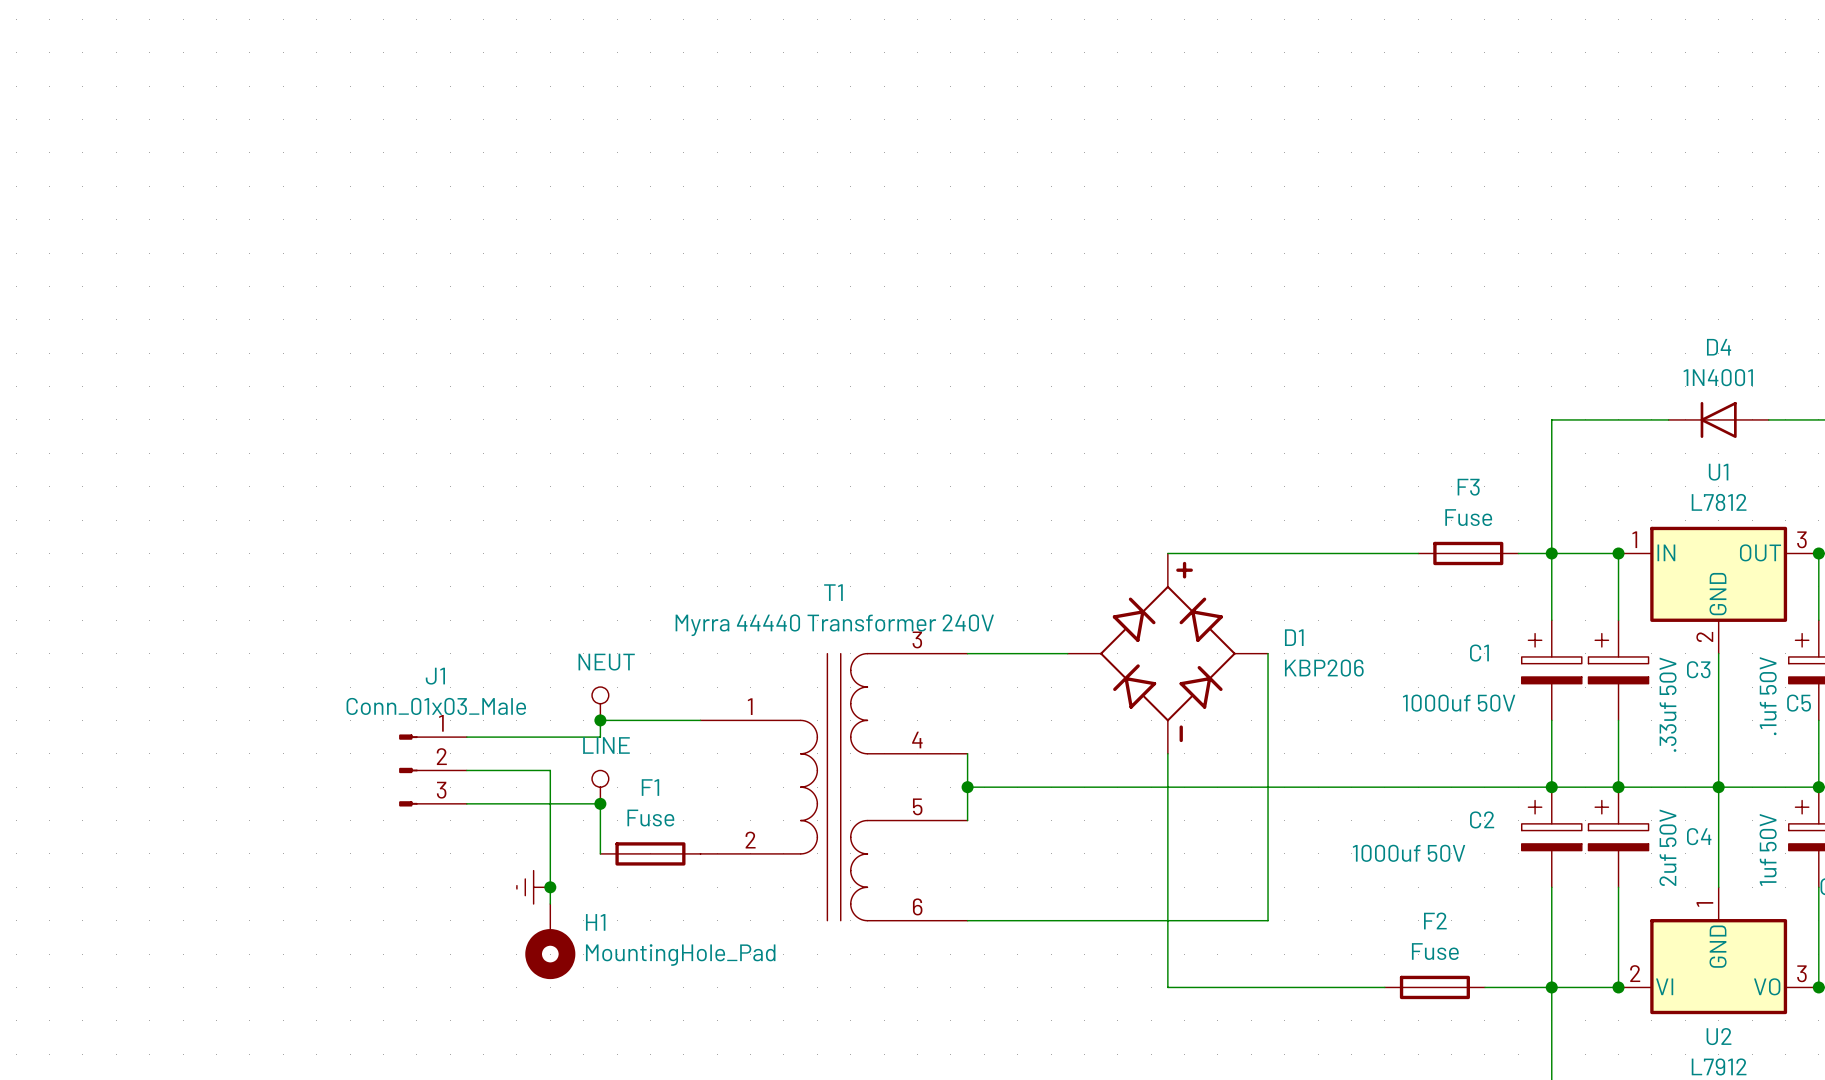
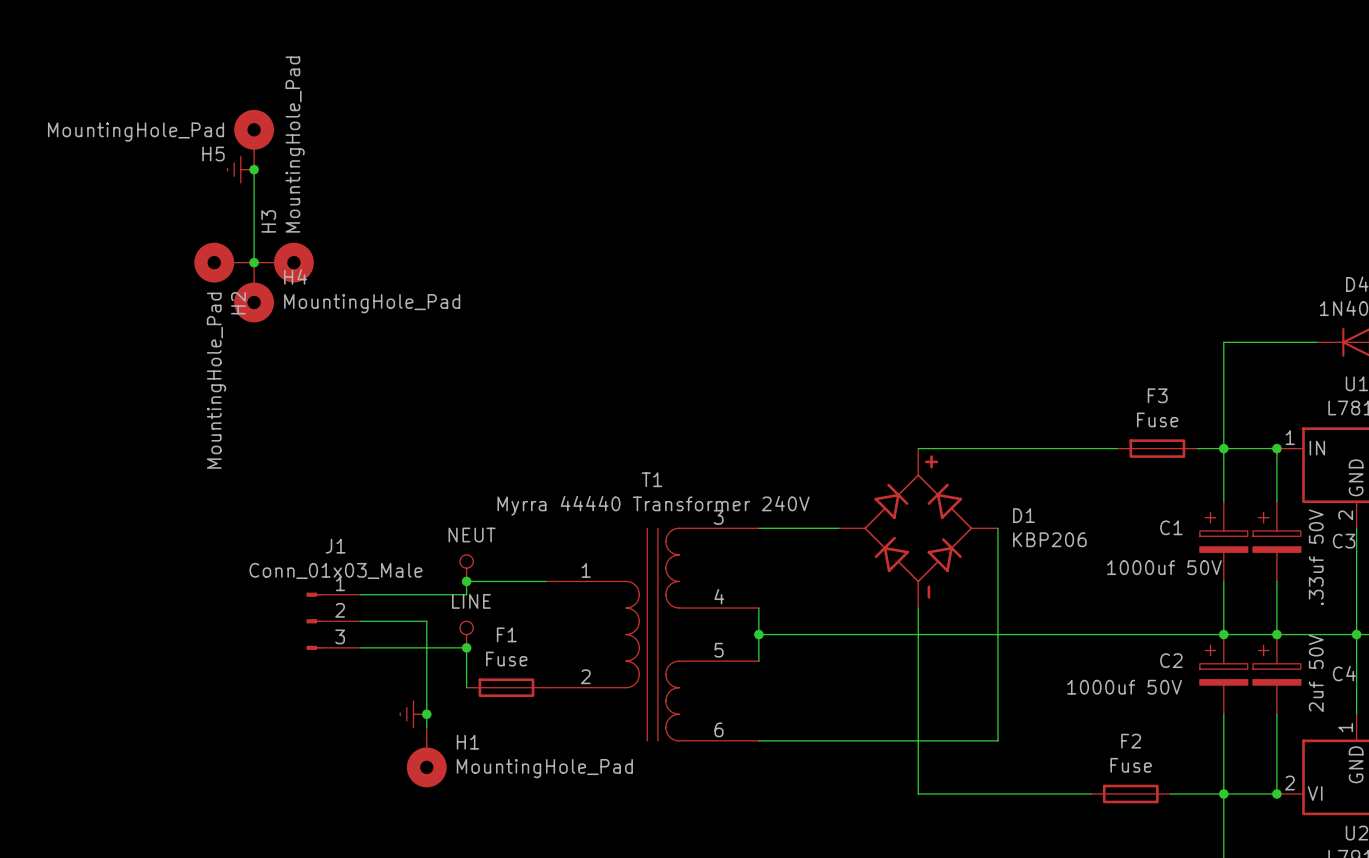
H5: none -> MountingHole_Pad (254, 139)
power symbol: none -> (240, 169)
wire: none -> (254, 169) (254, 262)
junction: none -> (254, 169)
H2: none -> MountingHole_Pad (224, 262)
junction: none -> (254, 262)
H3: none -> MountingHole_Pad (283, 262)
H4: none -> MountingHole_Pad (254, 292)

